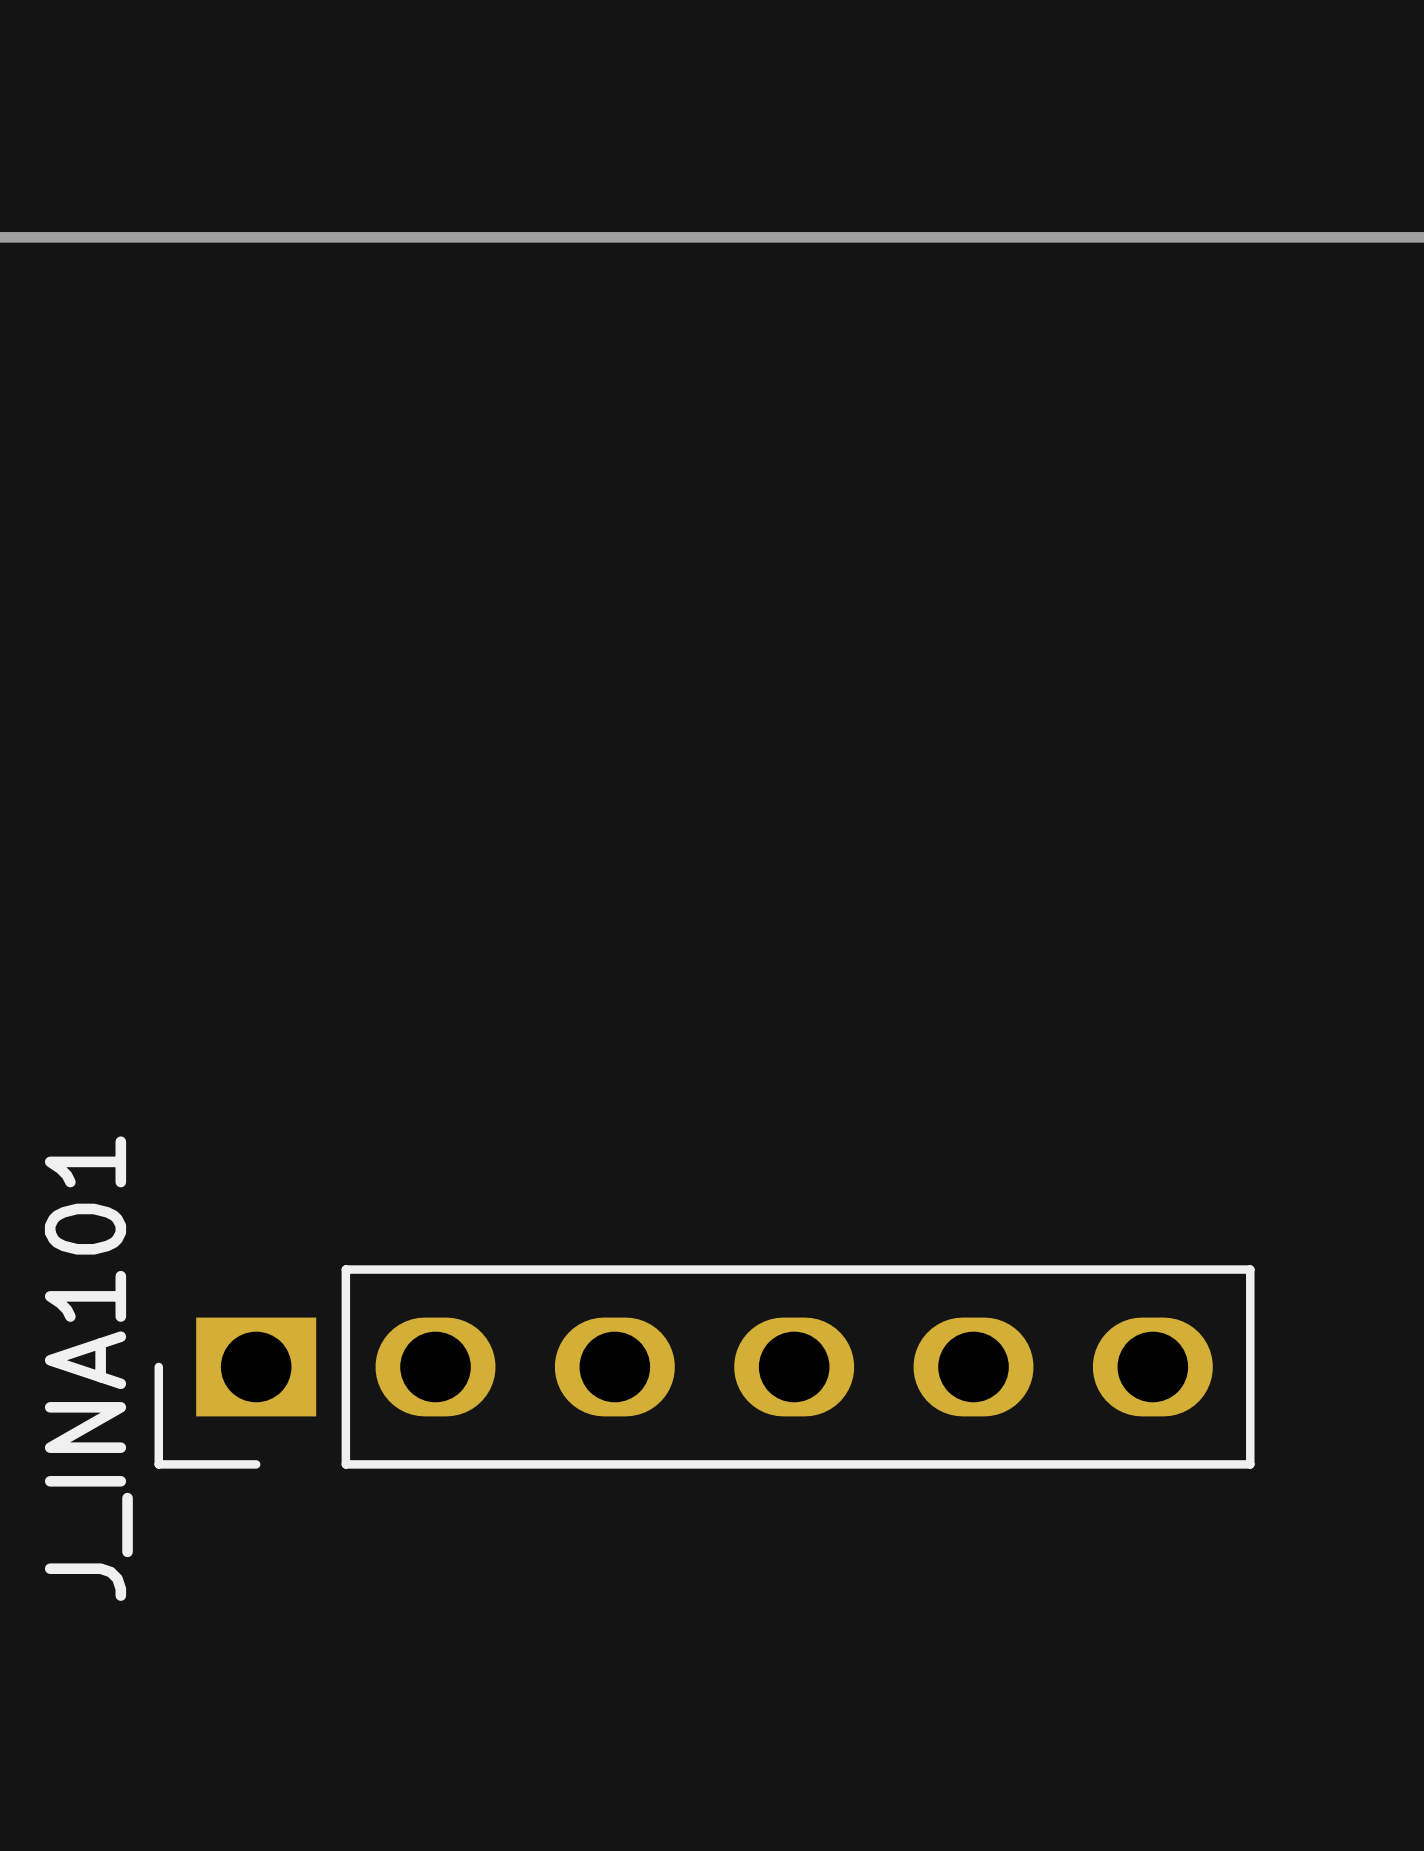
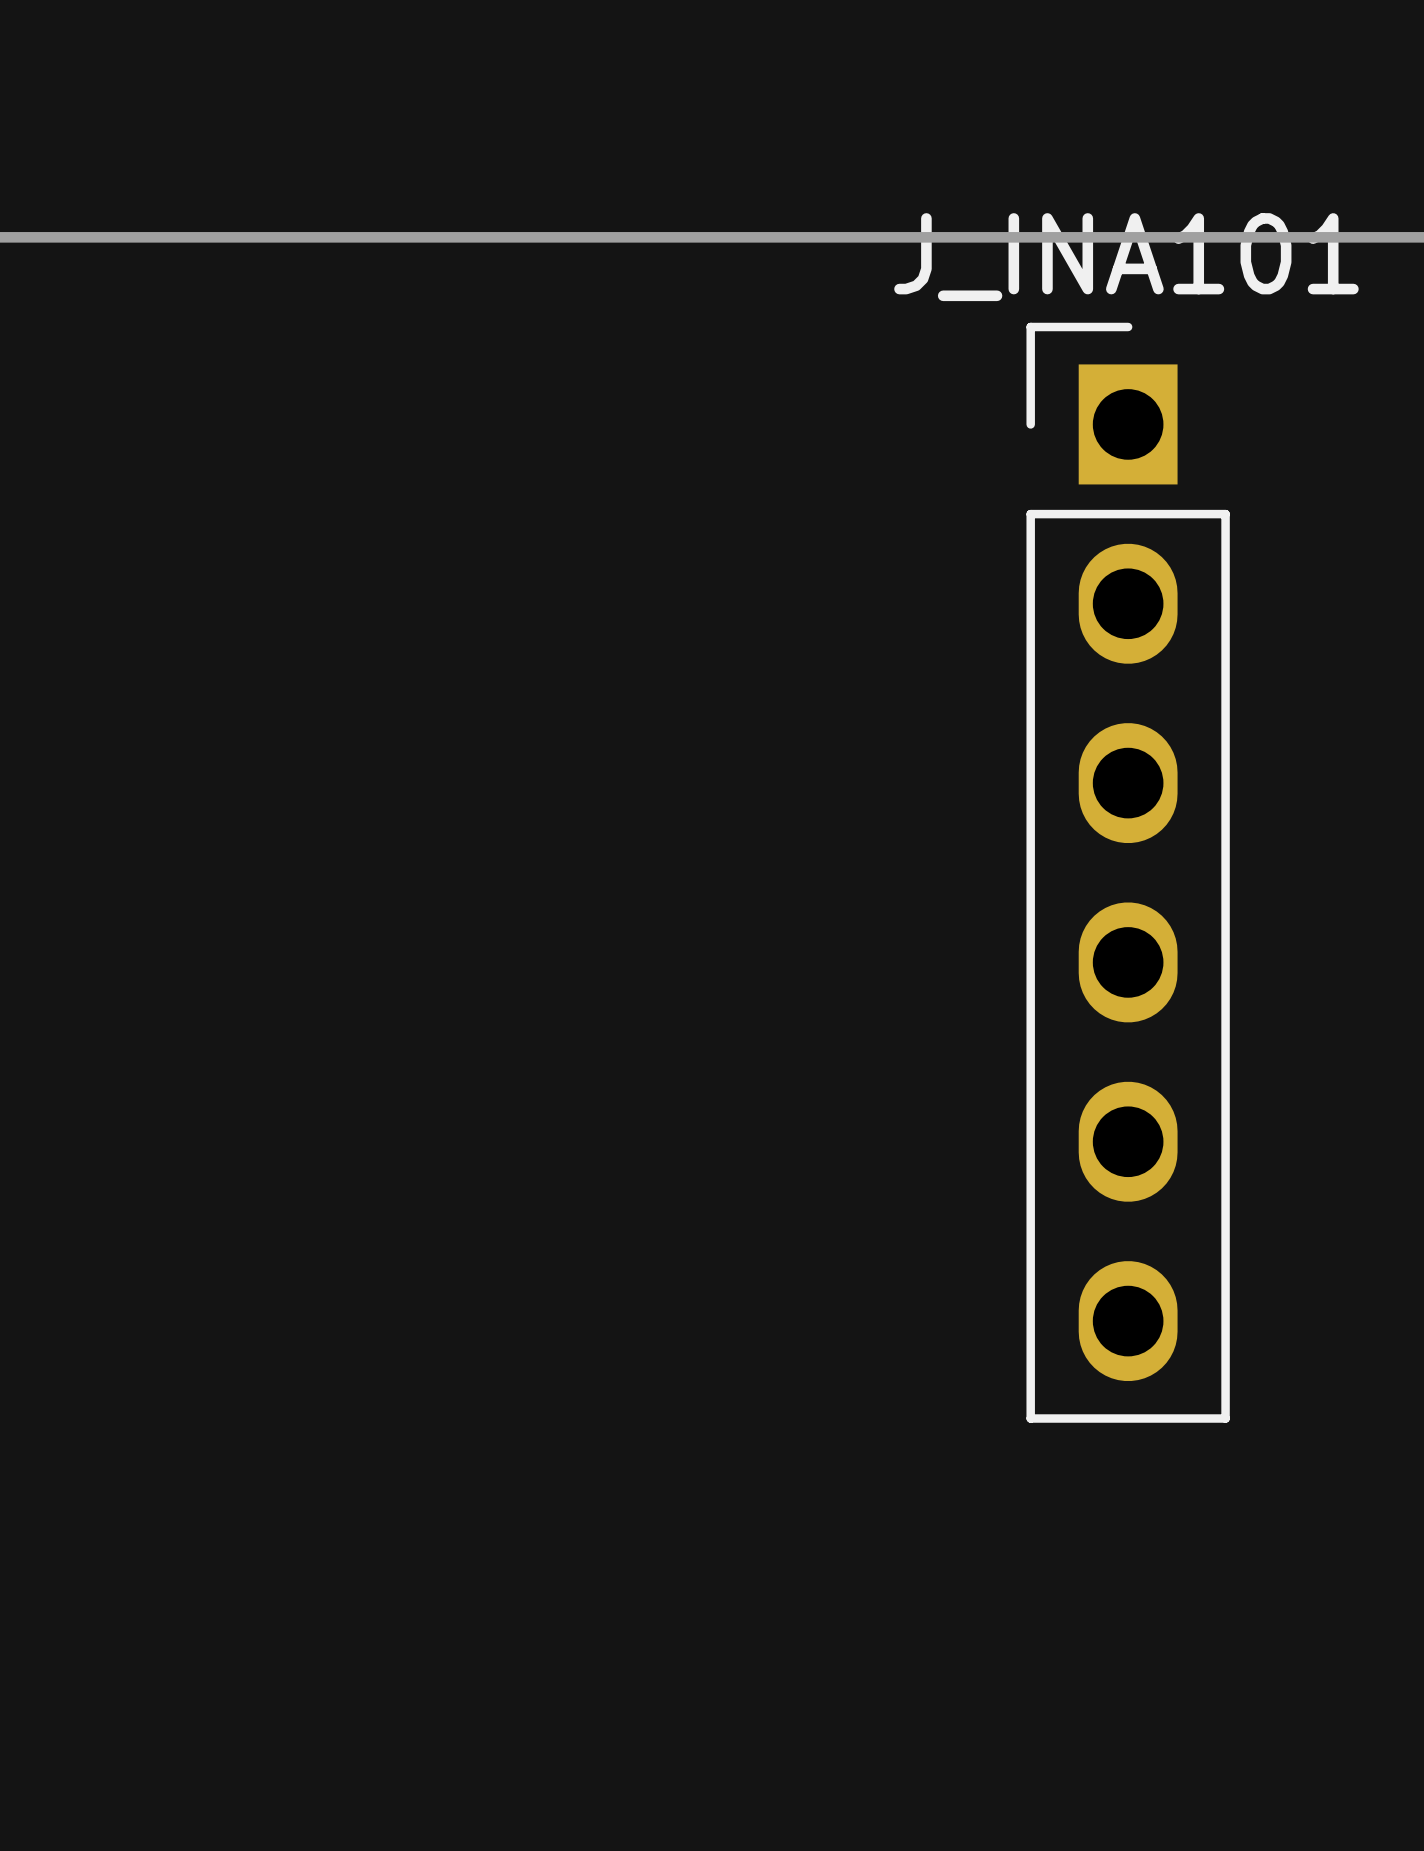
J_INA101 rotation: 0° (704, 1366) -> 90° clockwise (1128, 872)

